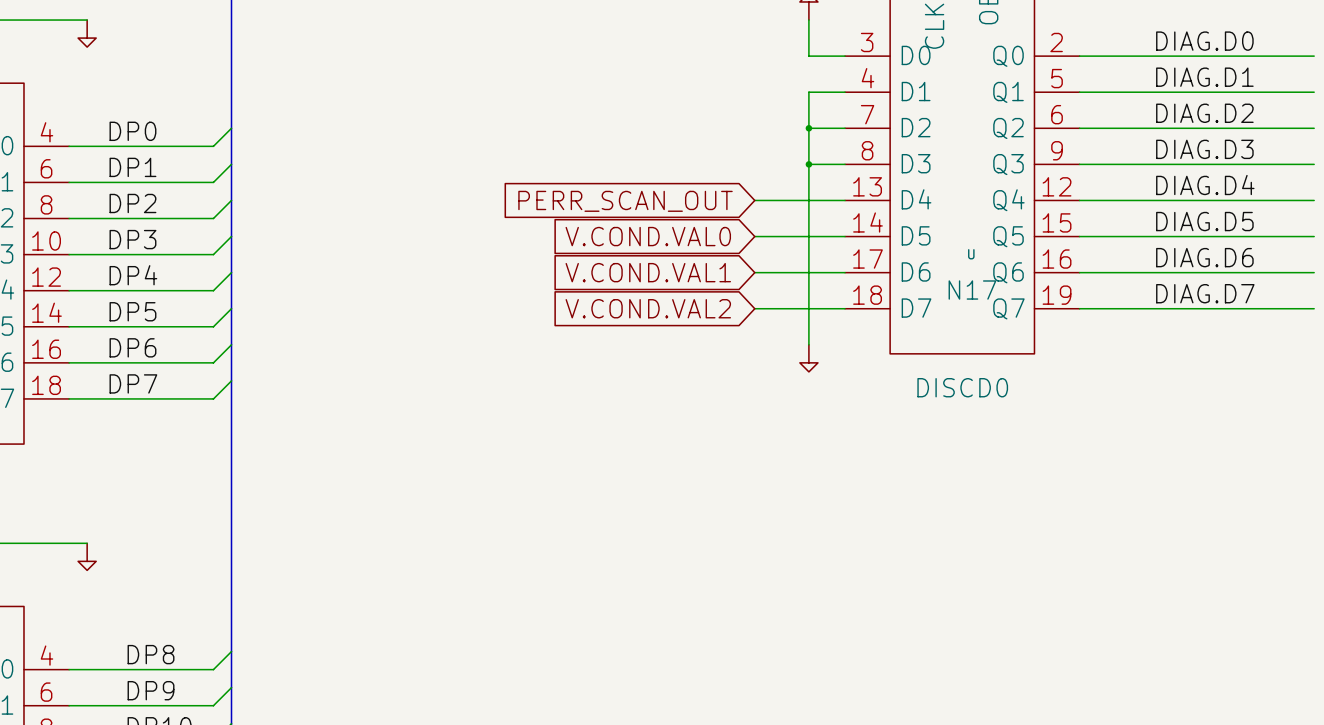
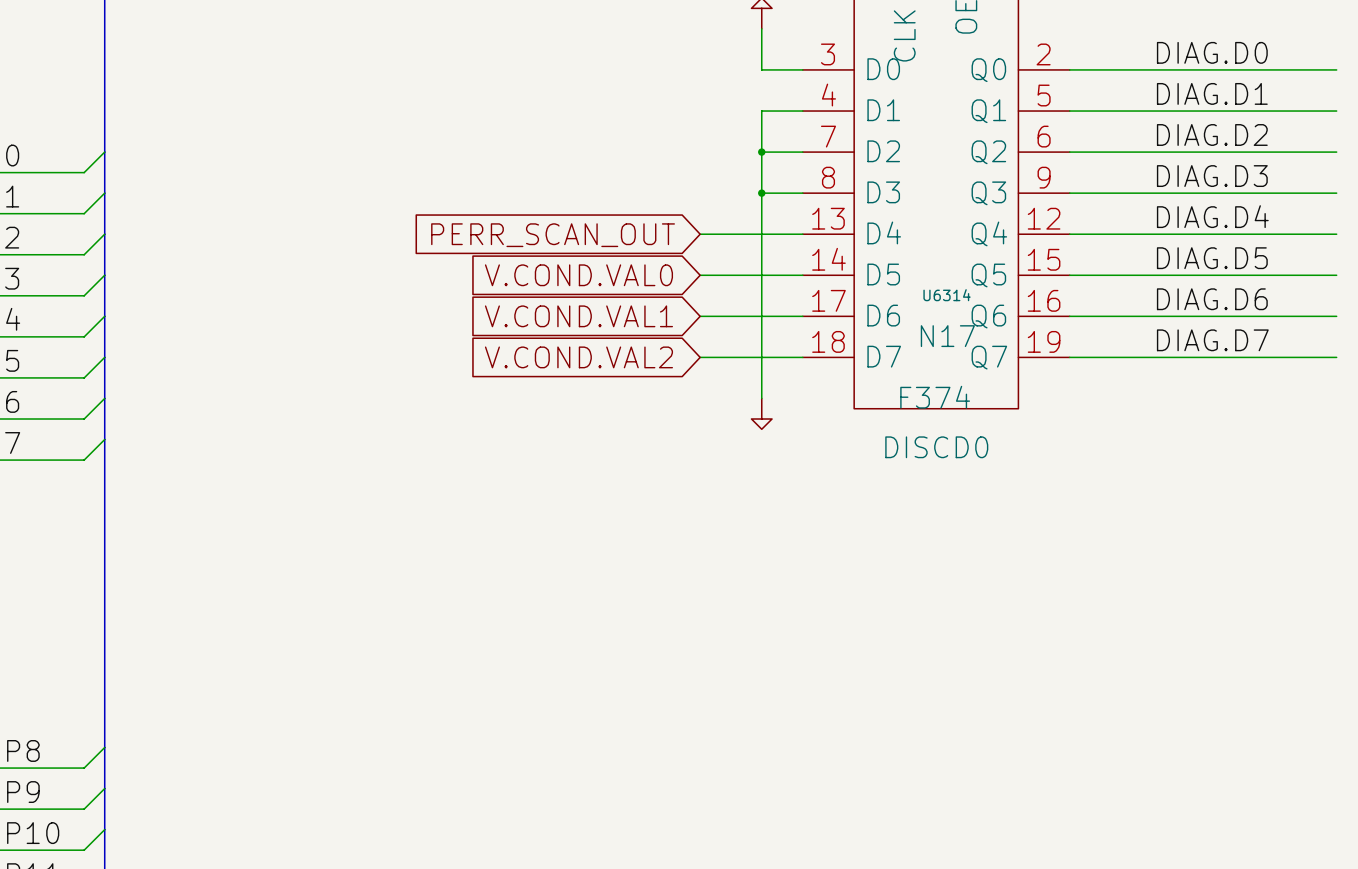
U name: U (971, 254) -> U6314 (947, 295)
U value: none -> F374 (935, 397)

